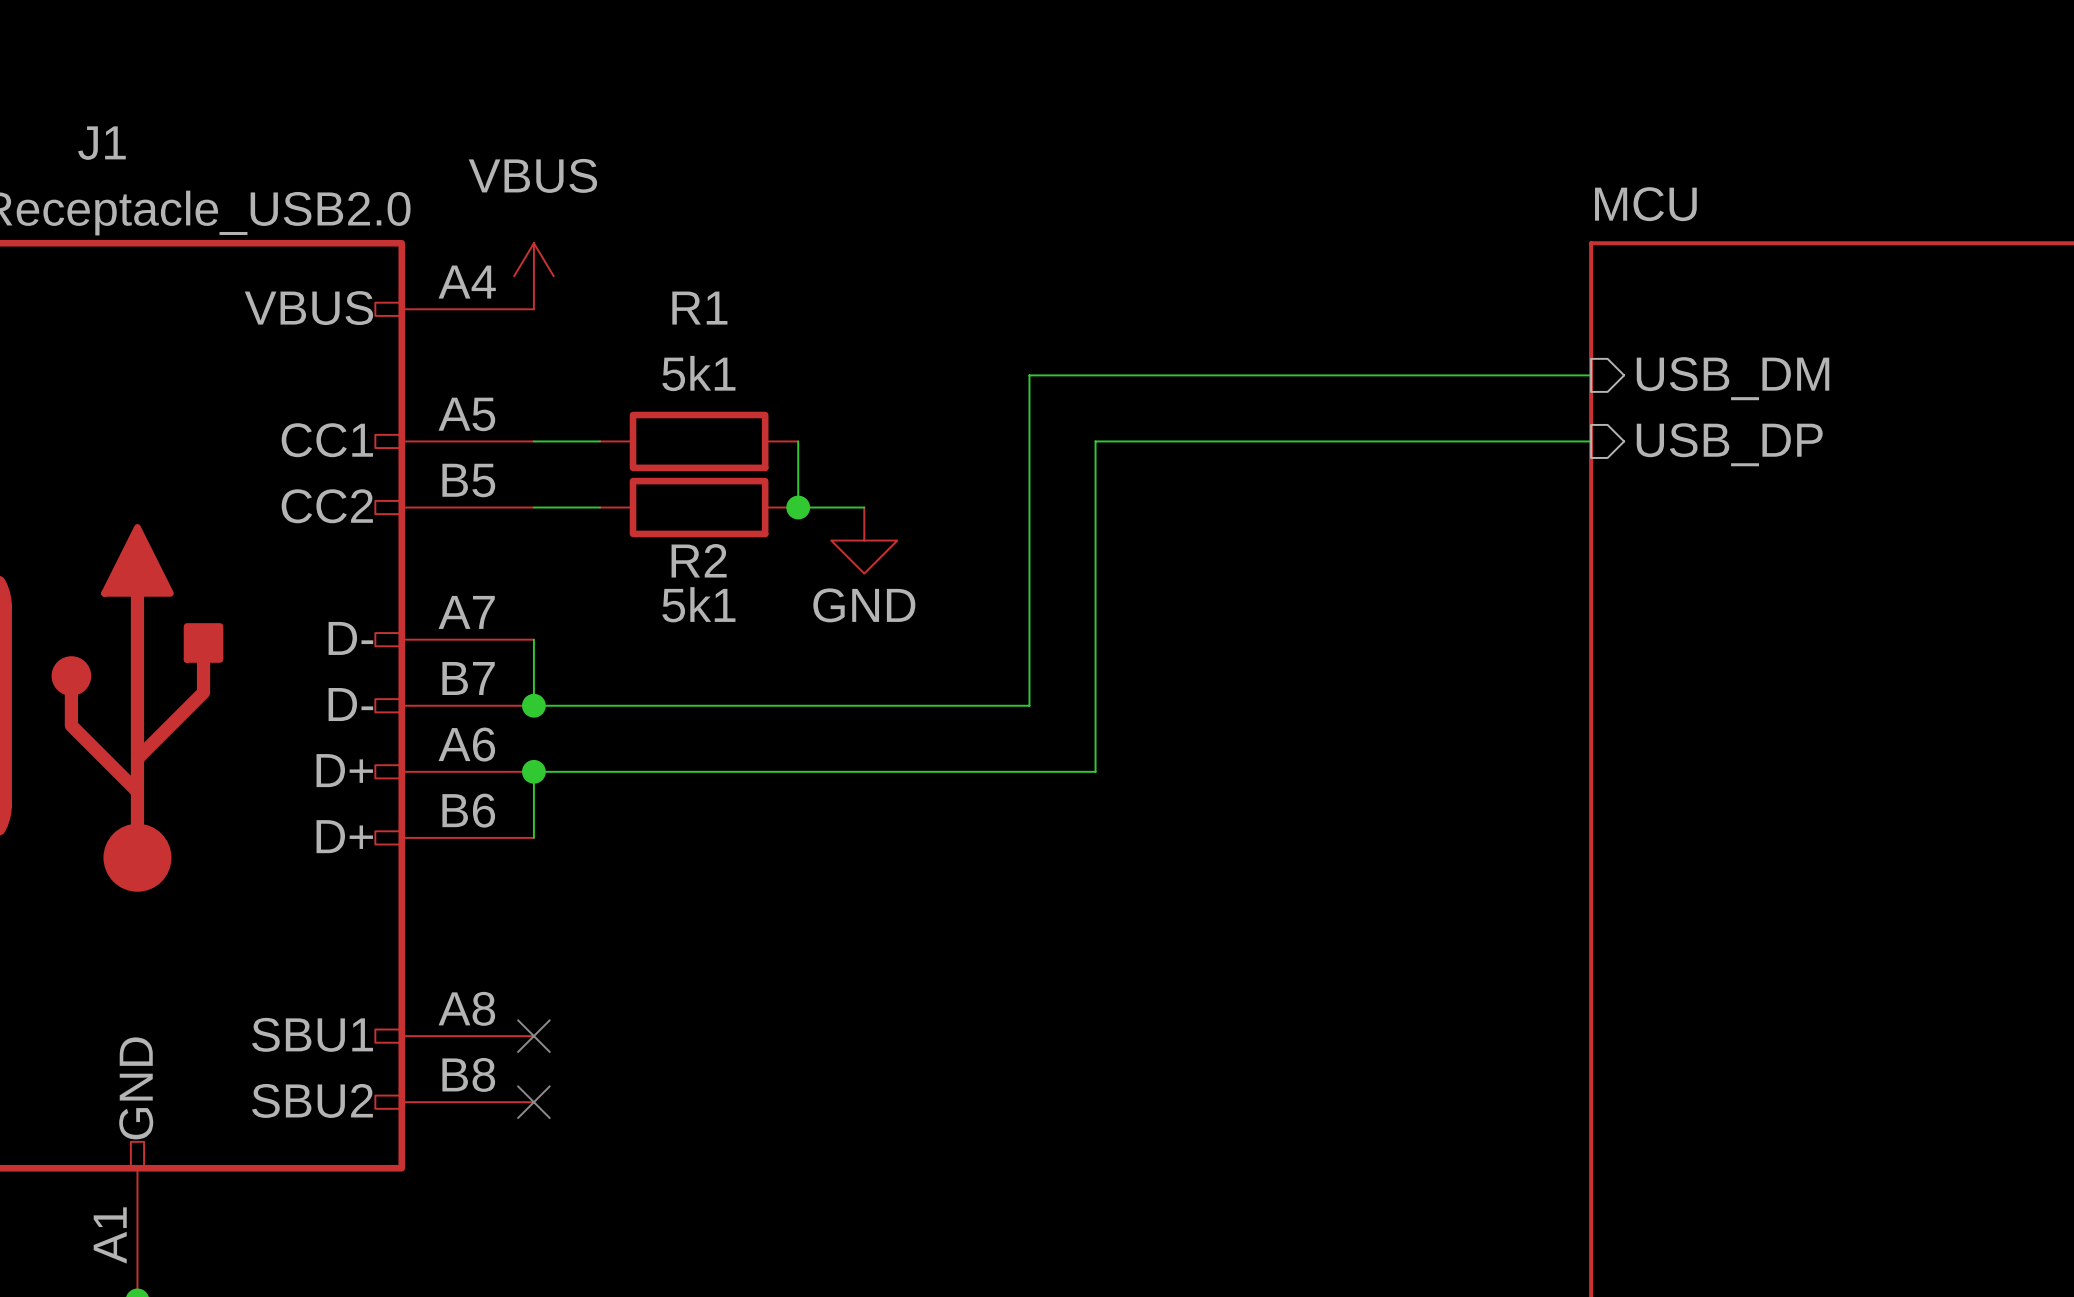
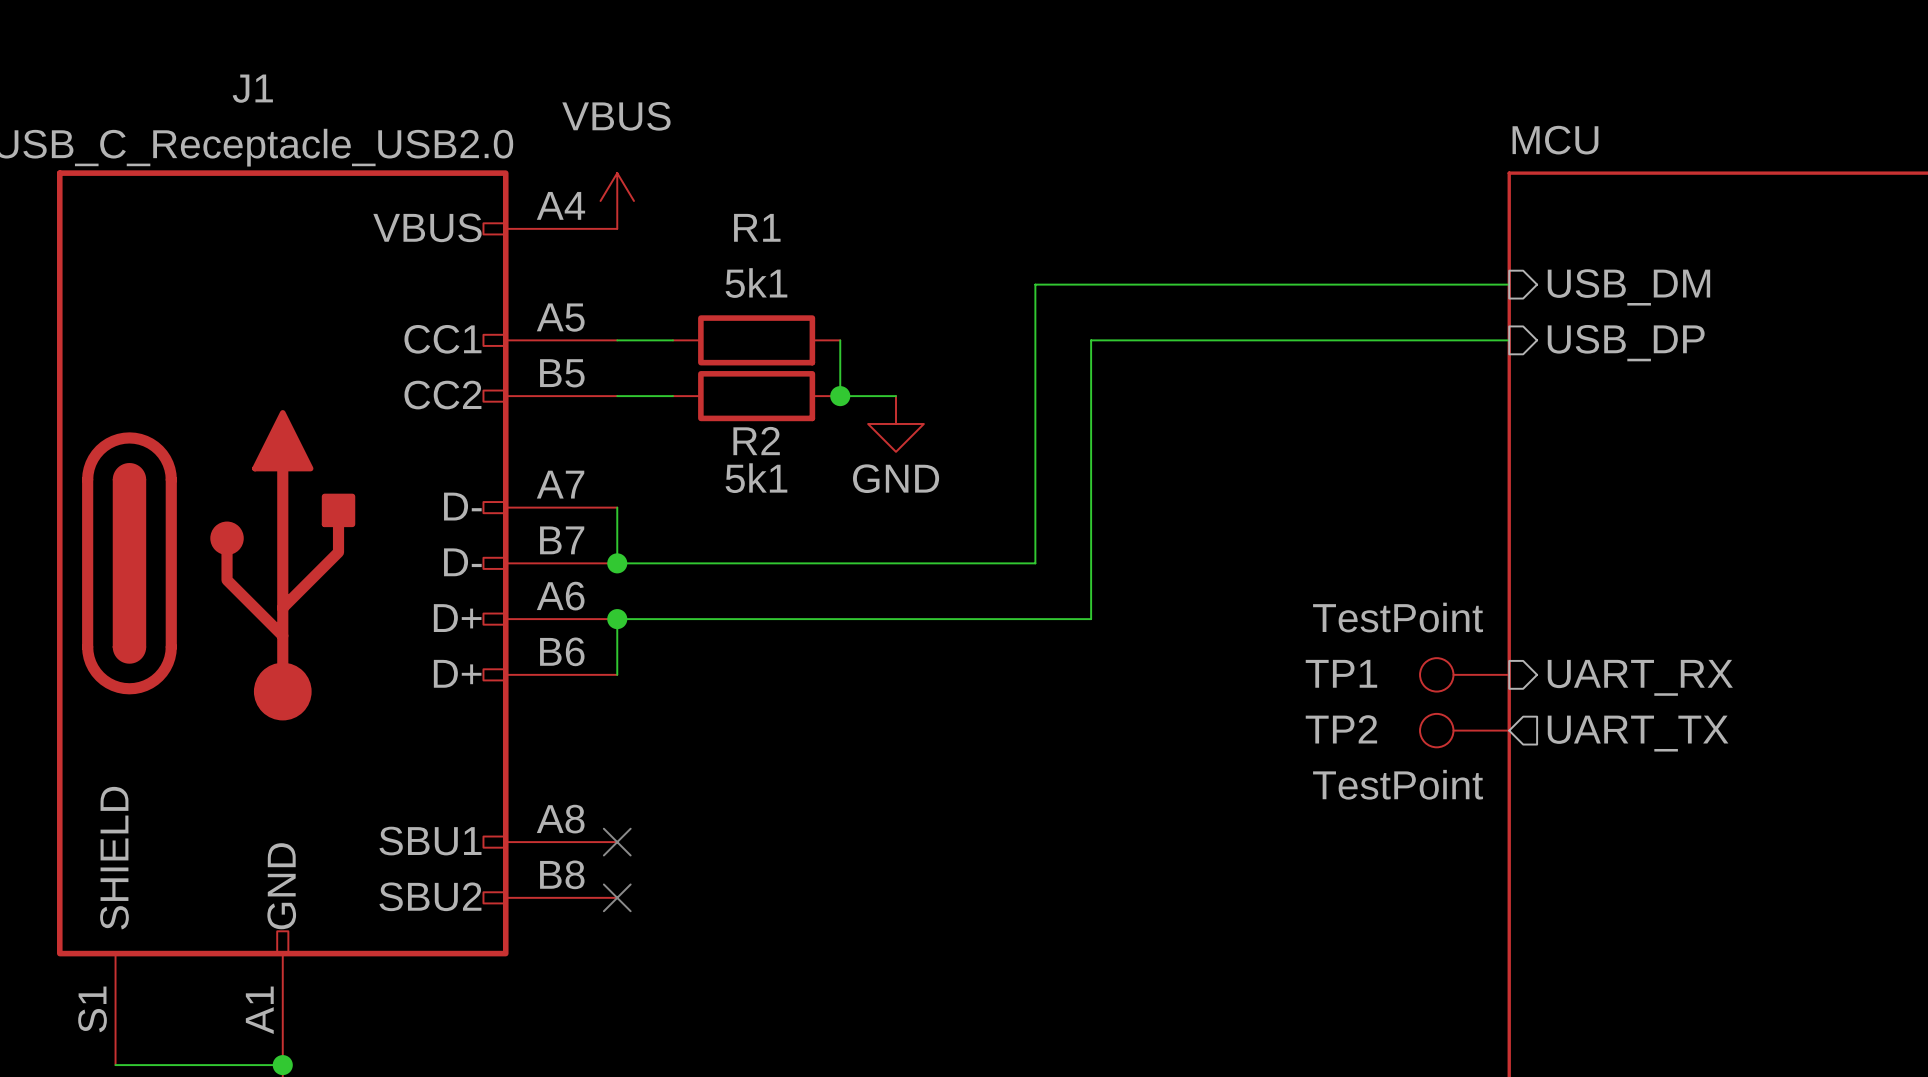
TP1: none -> TestPoint (1464, 674)
sheet pin: none -> UART_RX (1640, 677)
TP2: none -> TestPoint (1464, 730)
sheet pin: none -> UART_TX (1638, 733)

